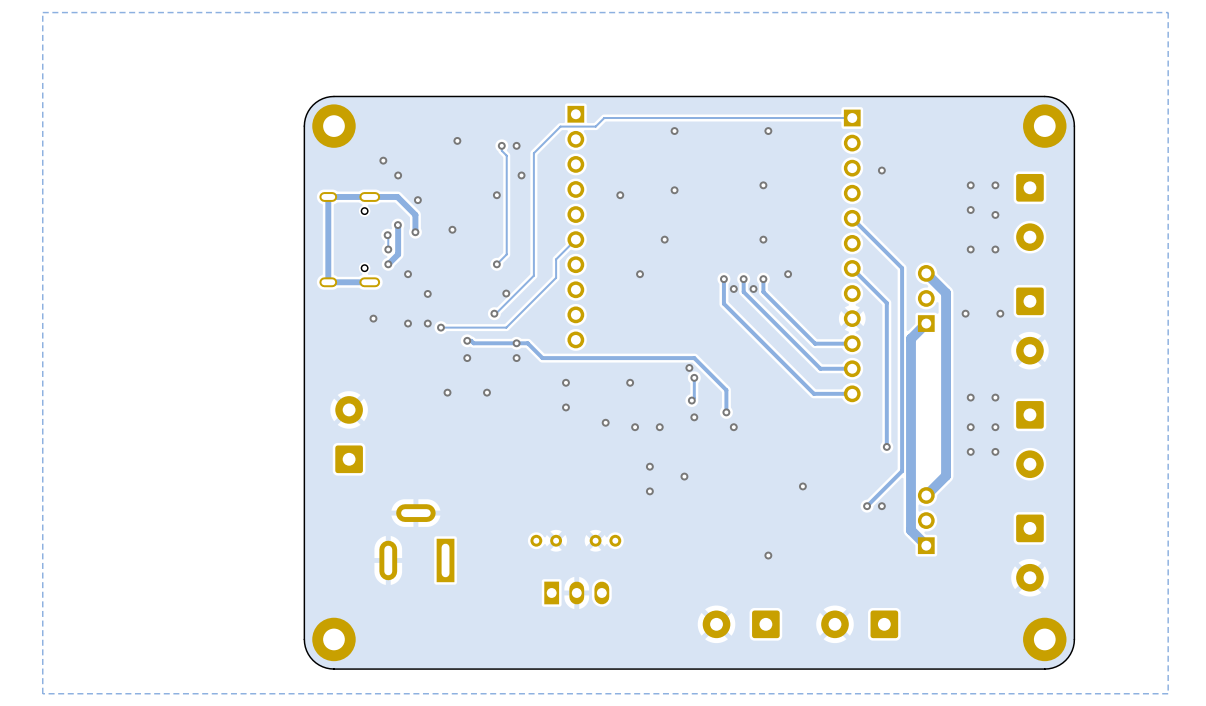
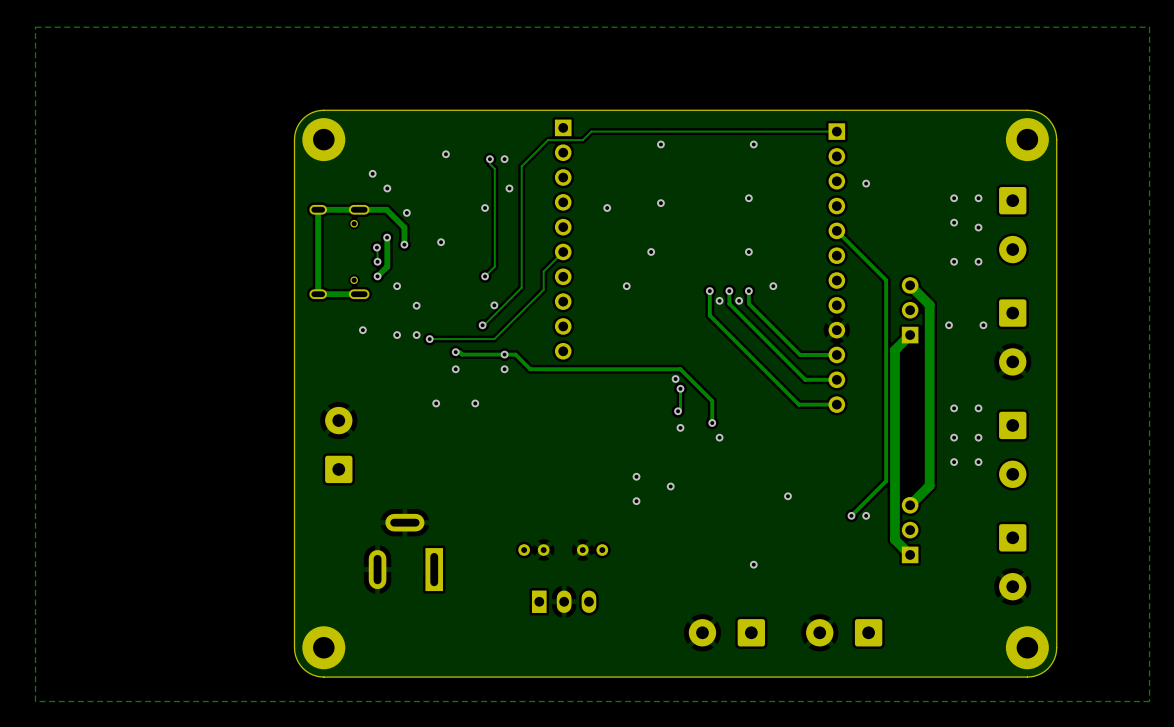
track: (852, 268) (886, 303) (886, 446) -> none
via: (565, 382) -> none
via: (630, 382) -> none
via: (565, 407) -> none
via: (605, 422) -> none
via: (635, 427) -> none
via: (659, 427) -> none
via: (886, 446) -> none

